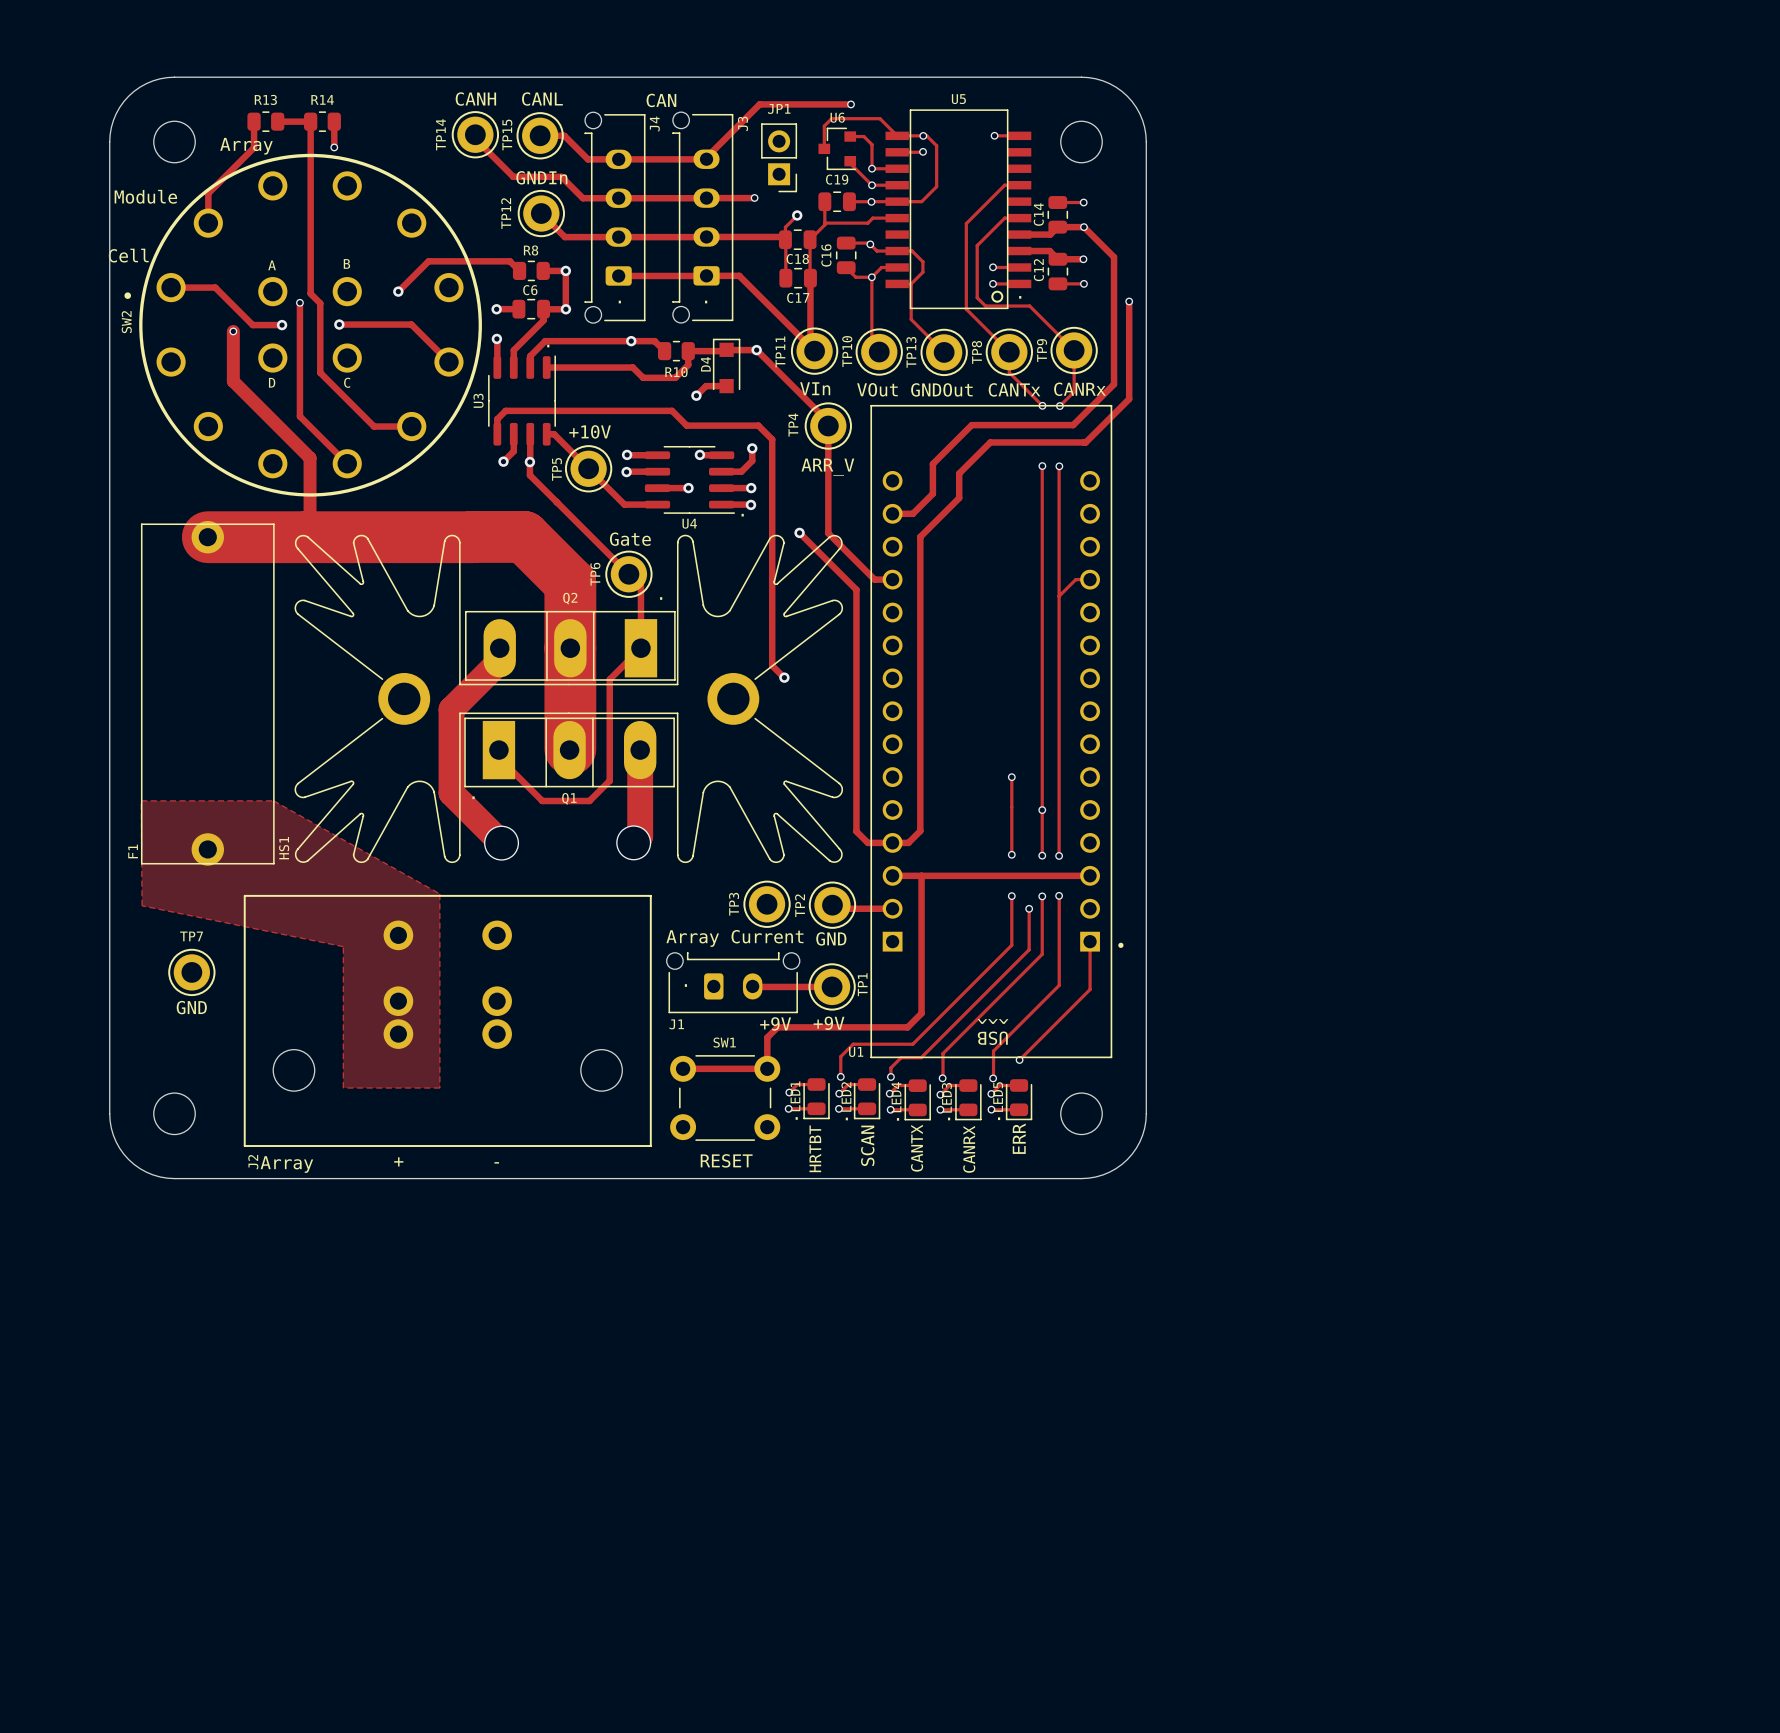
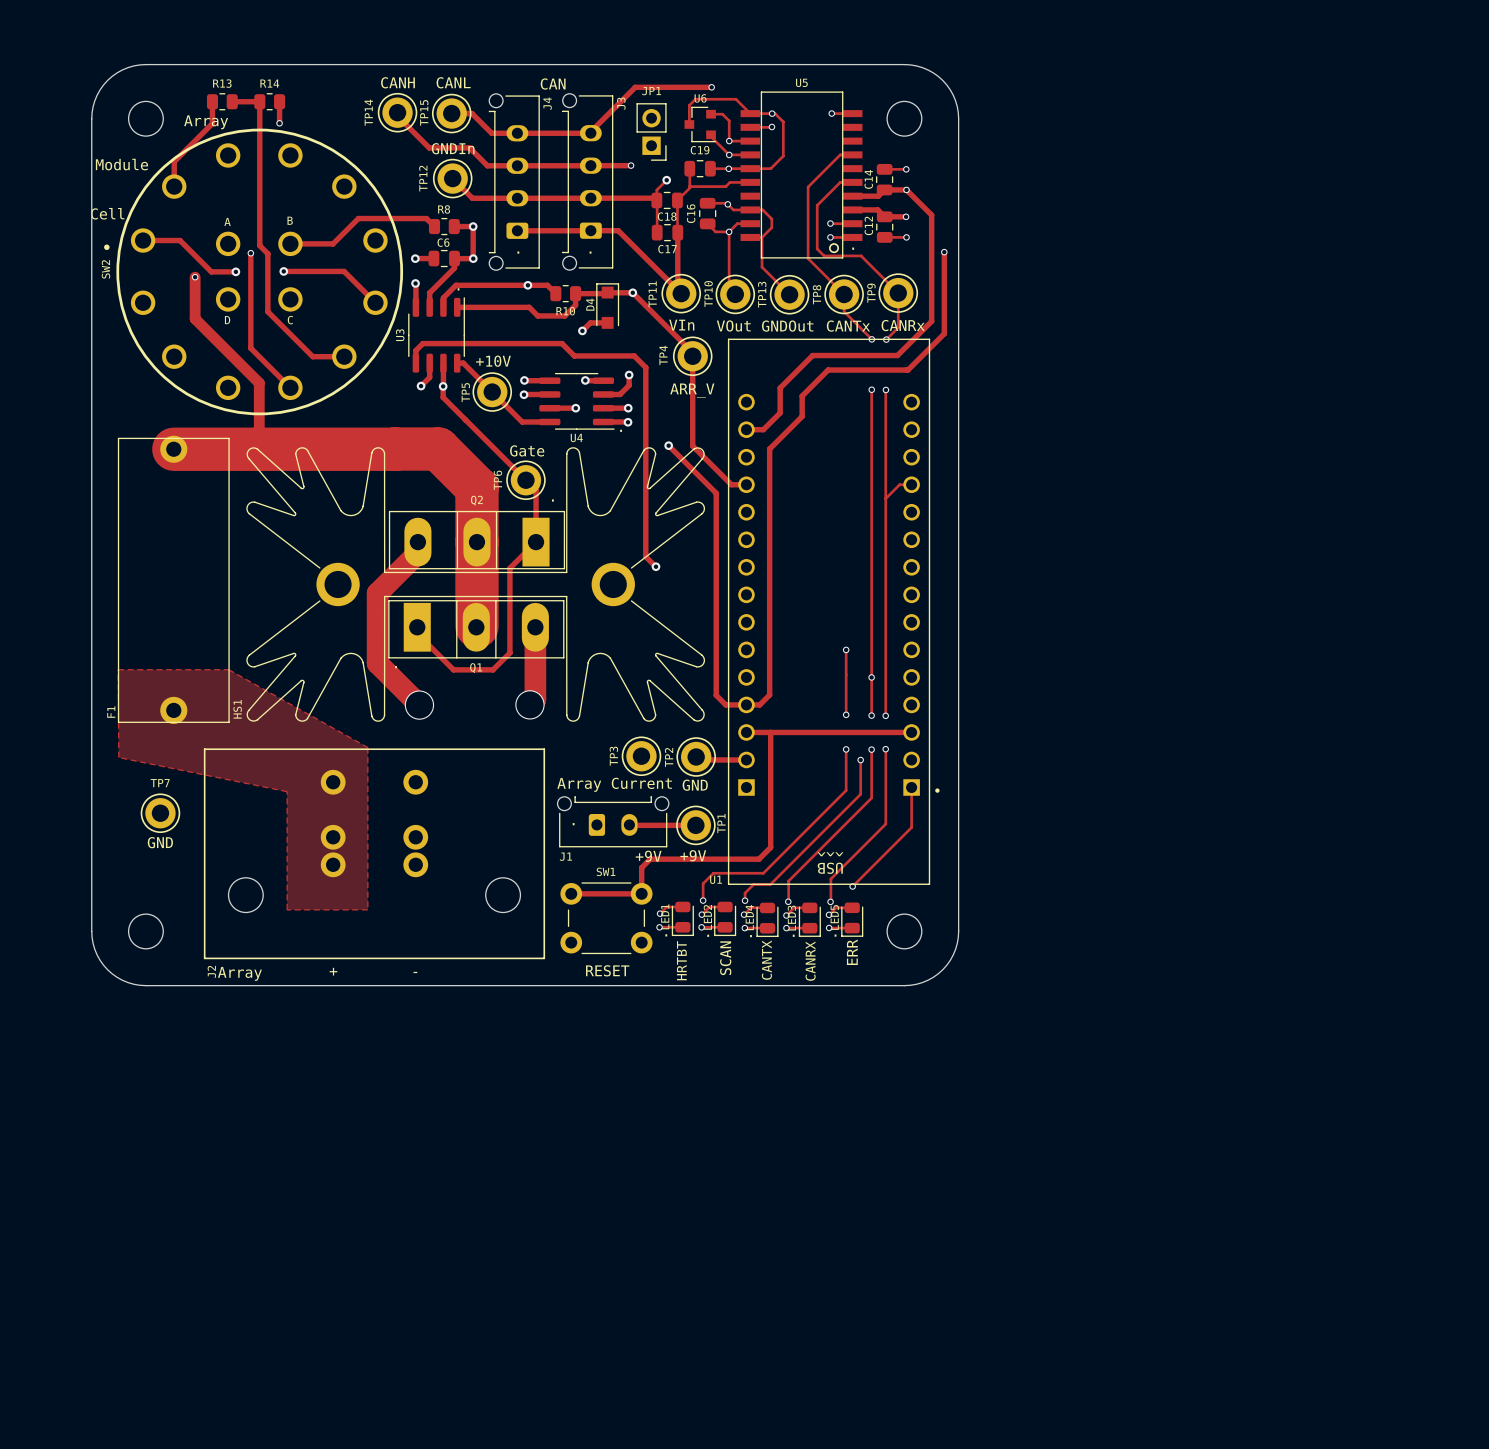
track: none -> (290, 243) (333, 243)
via: (398, 291) -> none

